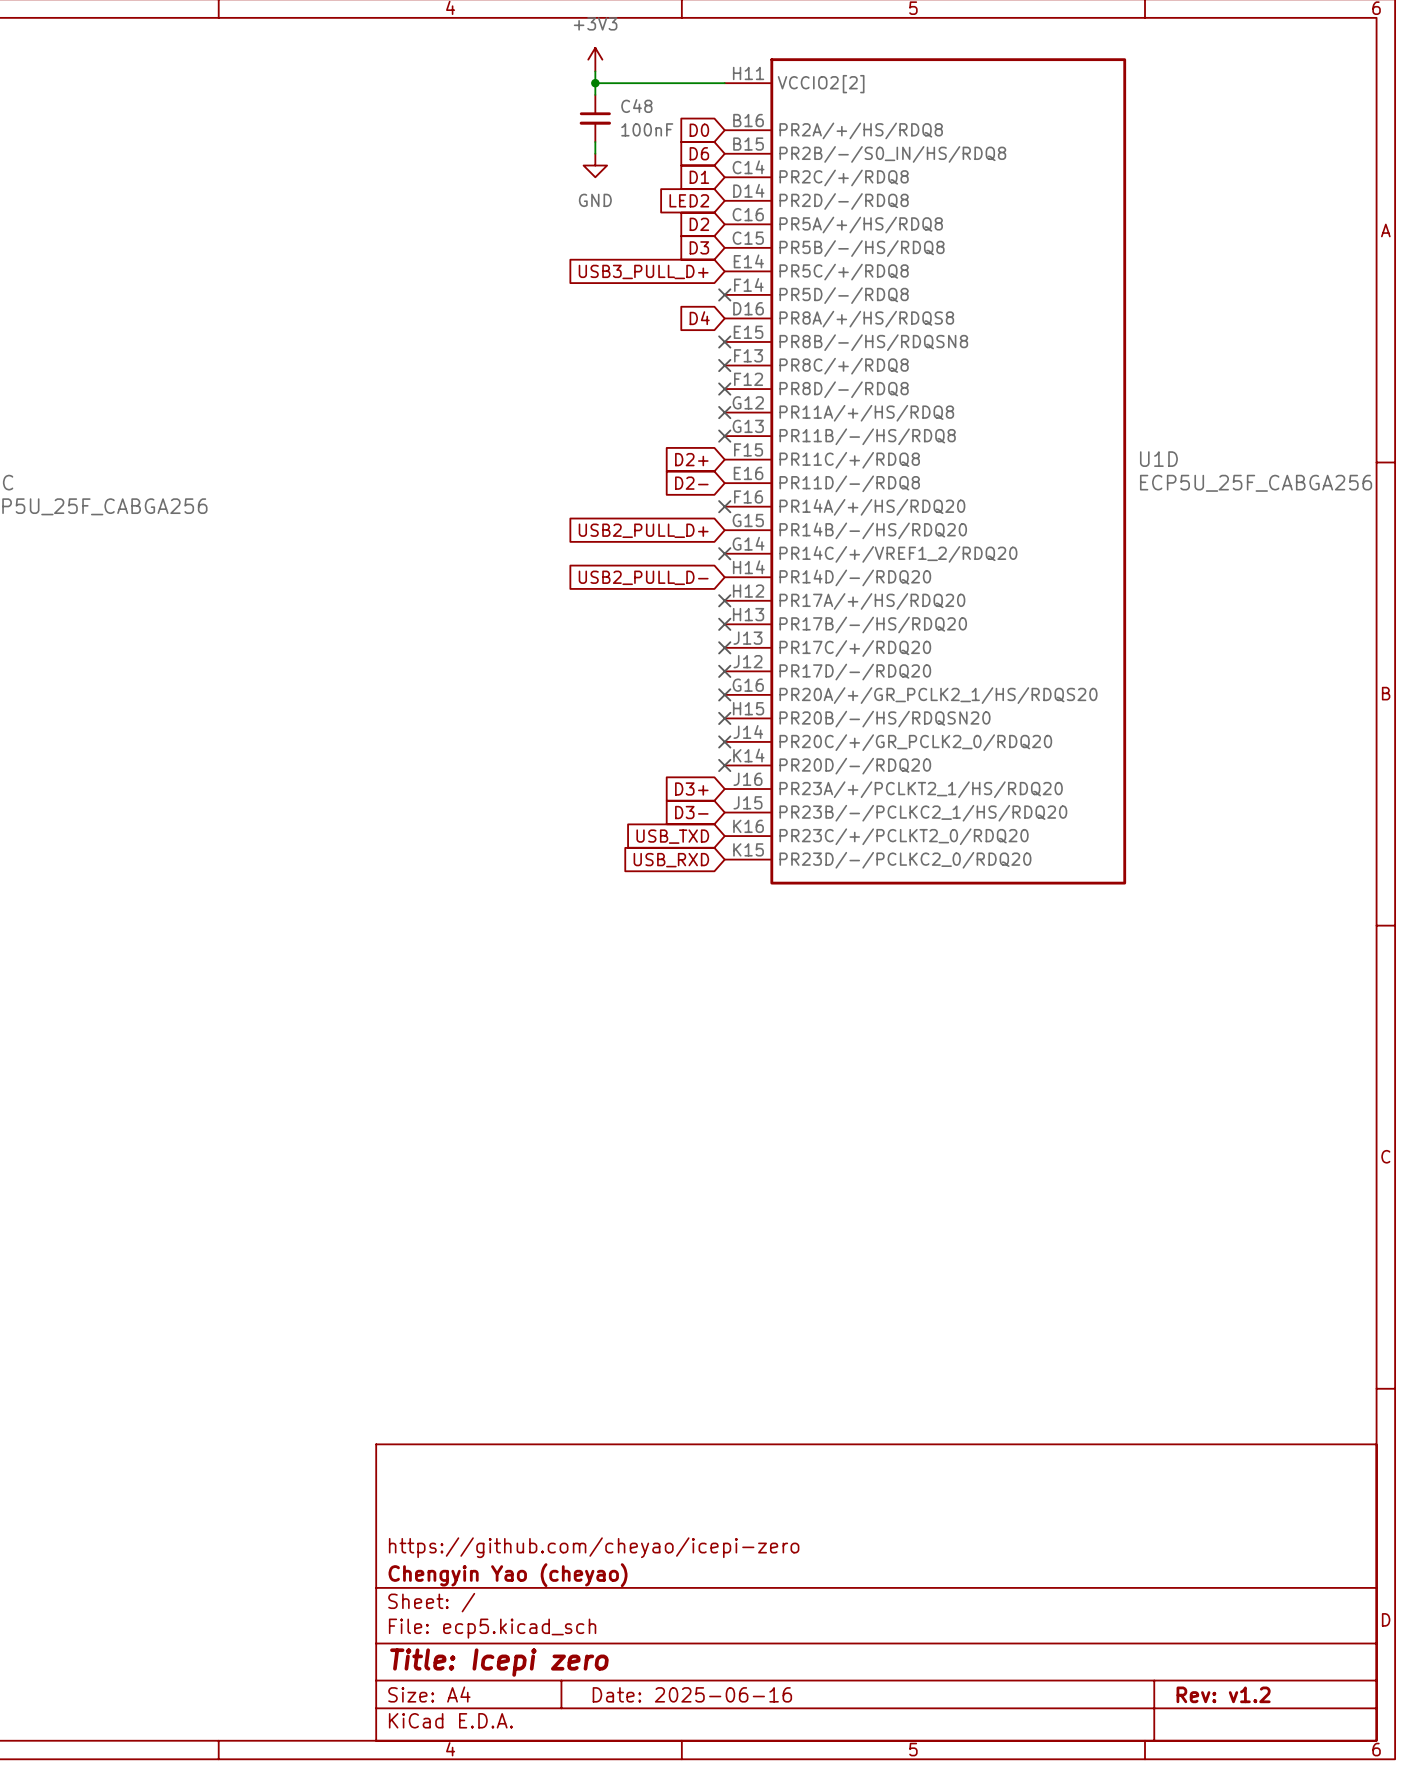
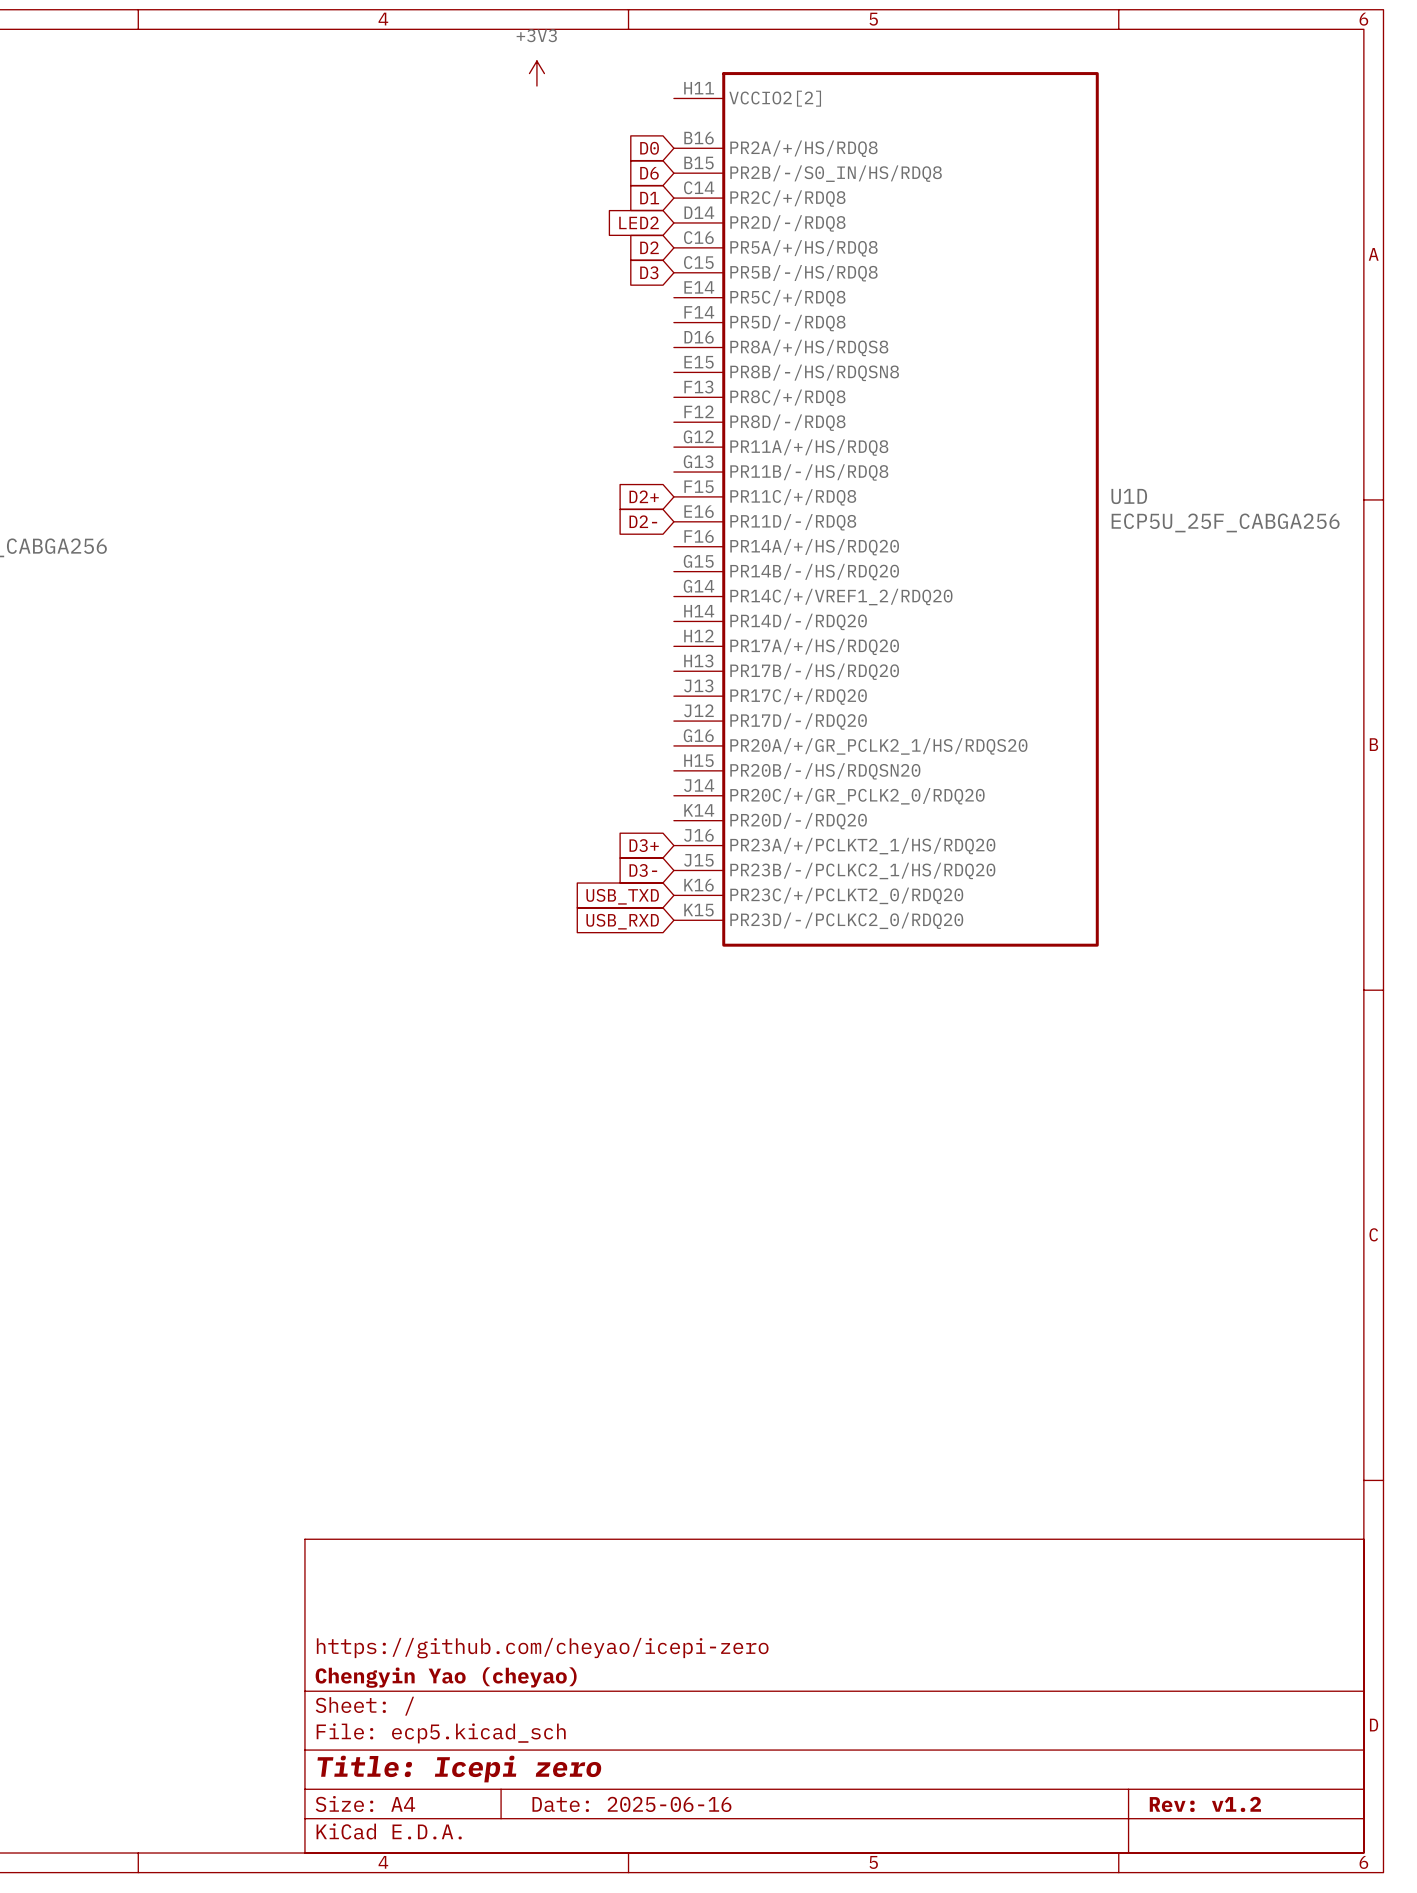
wire: (595, 71) (595, 94) -> none
wire: (595, 83) (724, 83) -> none
junction: (595, 83) -> none
C48: 100nF (595, 118) -> none
wire: (595, 141) (595, 153) -> none
power symbol: GND (595, 165) -> none
global label: USB3_PULL_D+ (643, 271) -> none
no-connect mark: (724, 294) -> none
global label: D4 (699, 318) -> none
no-connect mark: (724, 341) -> none
no-connect mark: (724, 365) -> none
no-connect mark: (724, 389) -> none
no-connect mark: (724, 412) -> none
no-connect mark: (724, 436) -> none
no-connect mark: (724, 506) -> none
global label: USB2_PULL_D+ (643, 530) -> none
no-connect mark: (724, 553) -> none
global label: USB2_PULL_D- (643, 577) -> none
no-connect mark: (724, 600) -> none
no-connect mark: (724, 624) -> none
no-connect mark: (724, 647) -> none
no-connect mark: (724, 671) -> none
no-connect mark: (724, 694) -> none
no-connect mark: (724, 718) -> none
no-connect mark: (724, 741) -> none
no-connect mark: (724, 765) -> none

